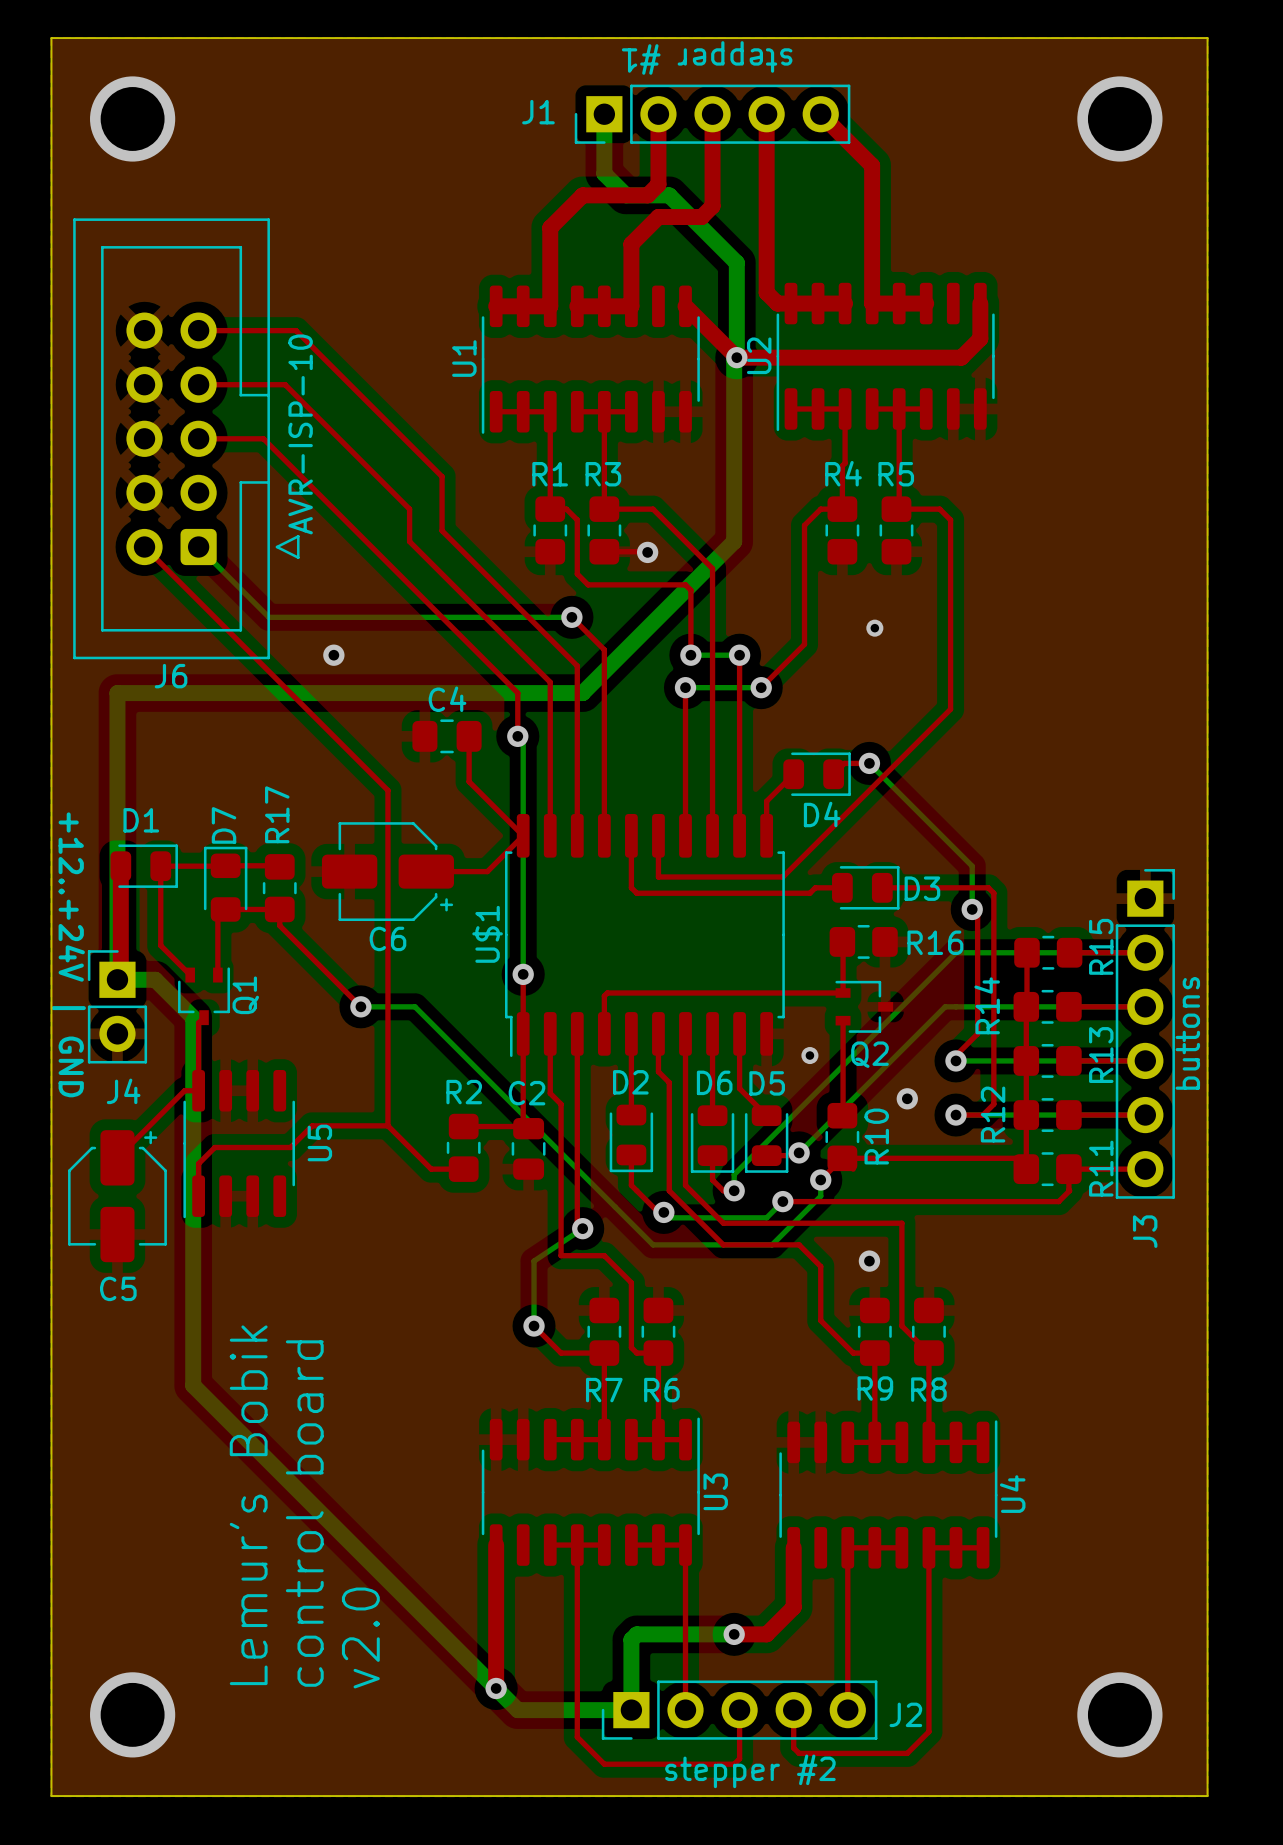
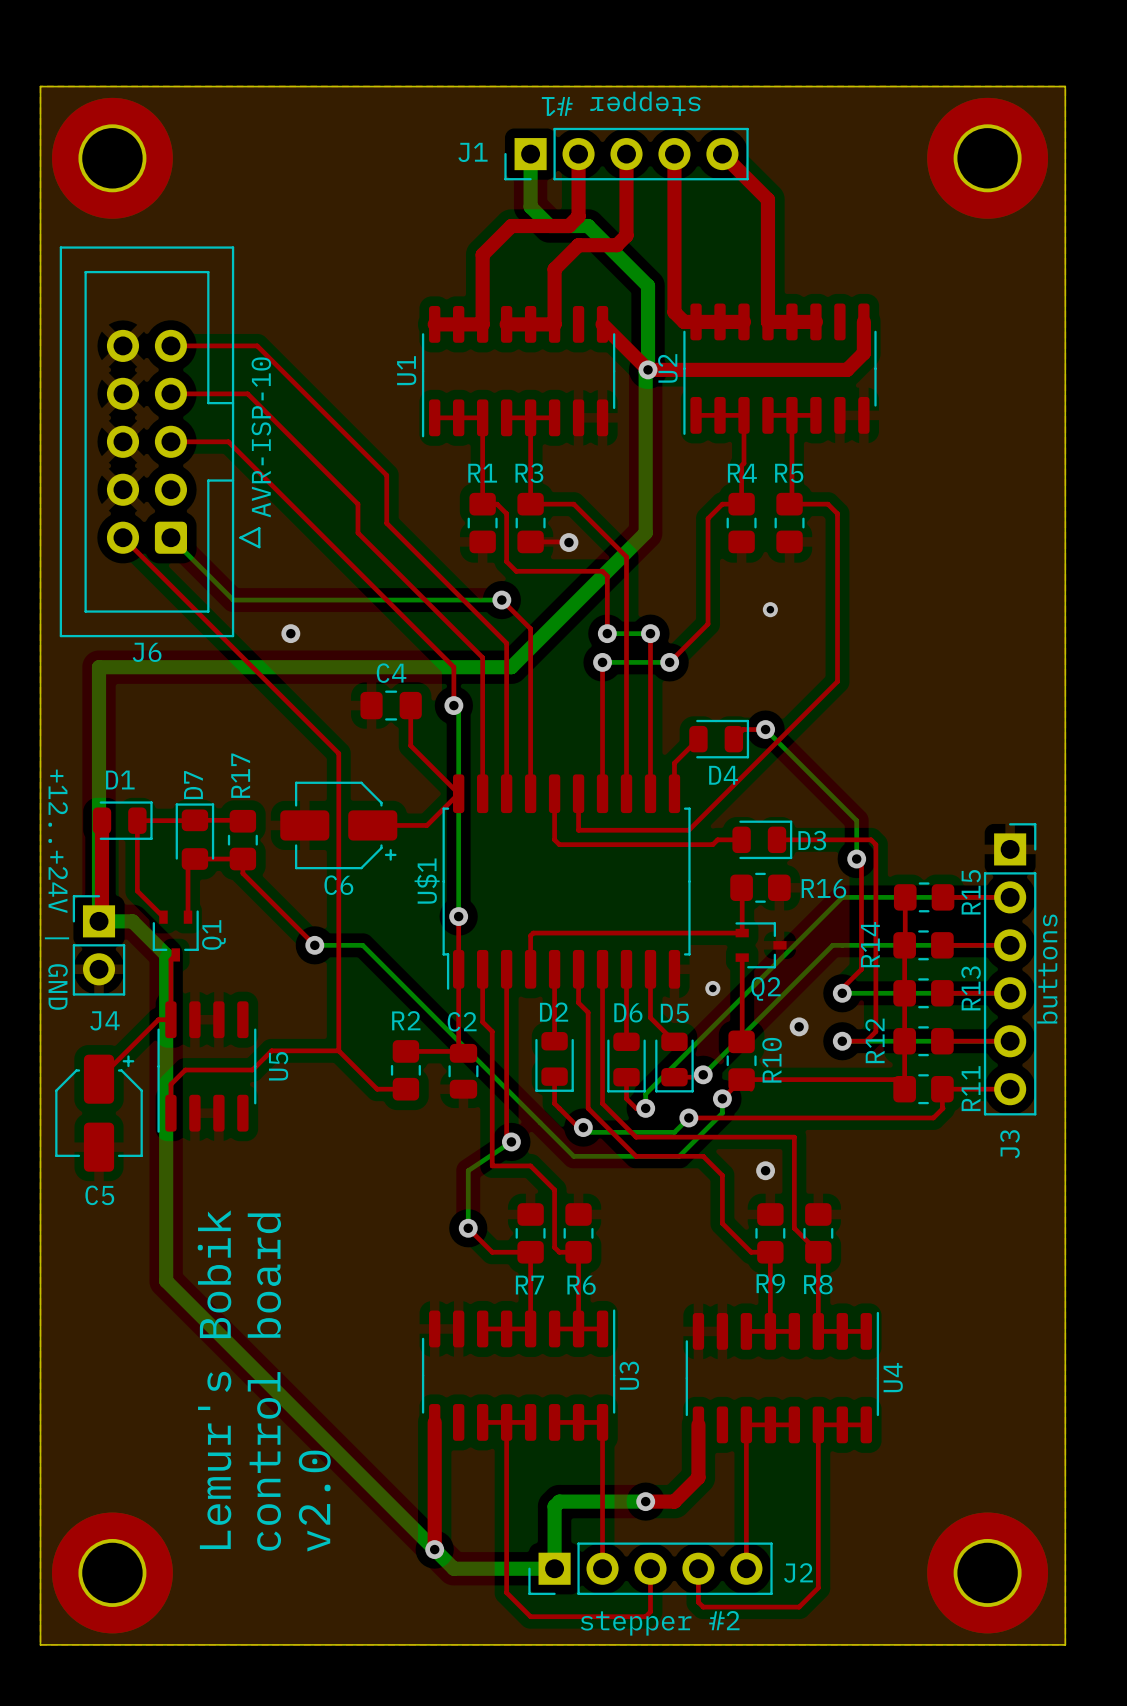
via: (132, 118) -> none
part: none -> (112, 158)
via: (1119, 118) -> none
part: none -> (987, 158)
via: (132, 1714) -> none
part: none -> (112, 1572)
via: (1119, 1714) -> none
part: none -> (987, 1572)

